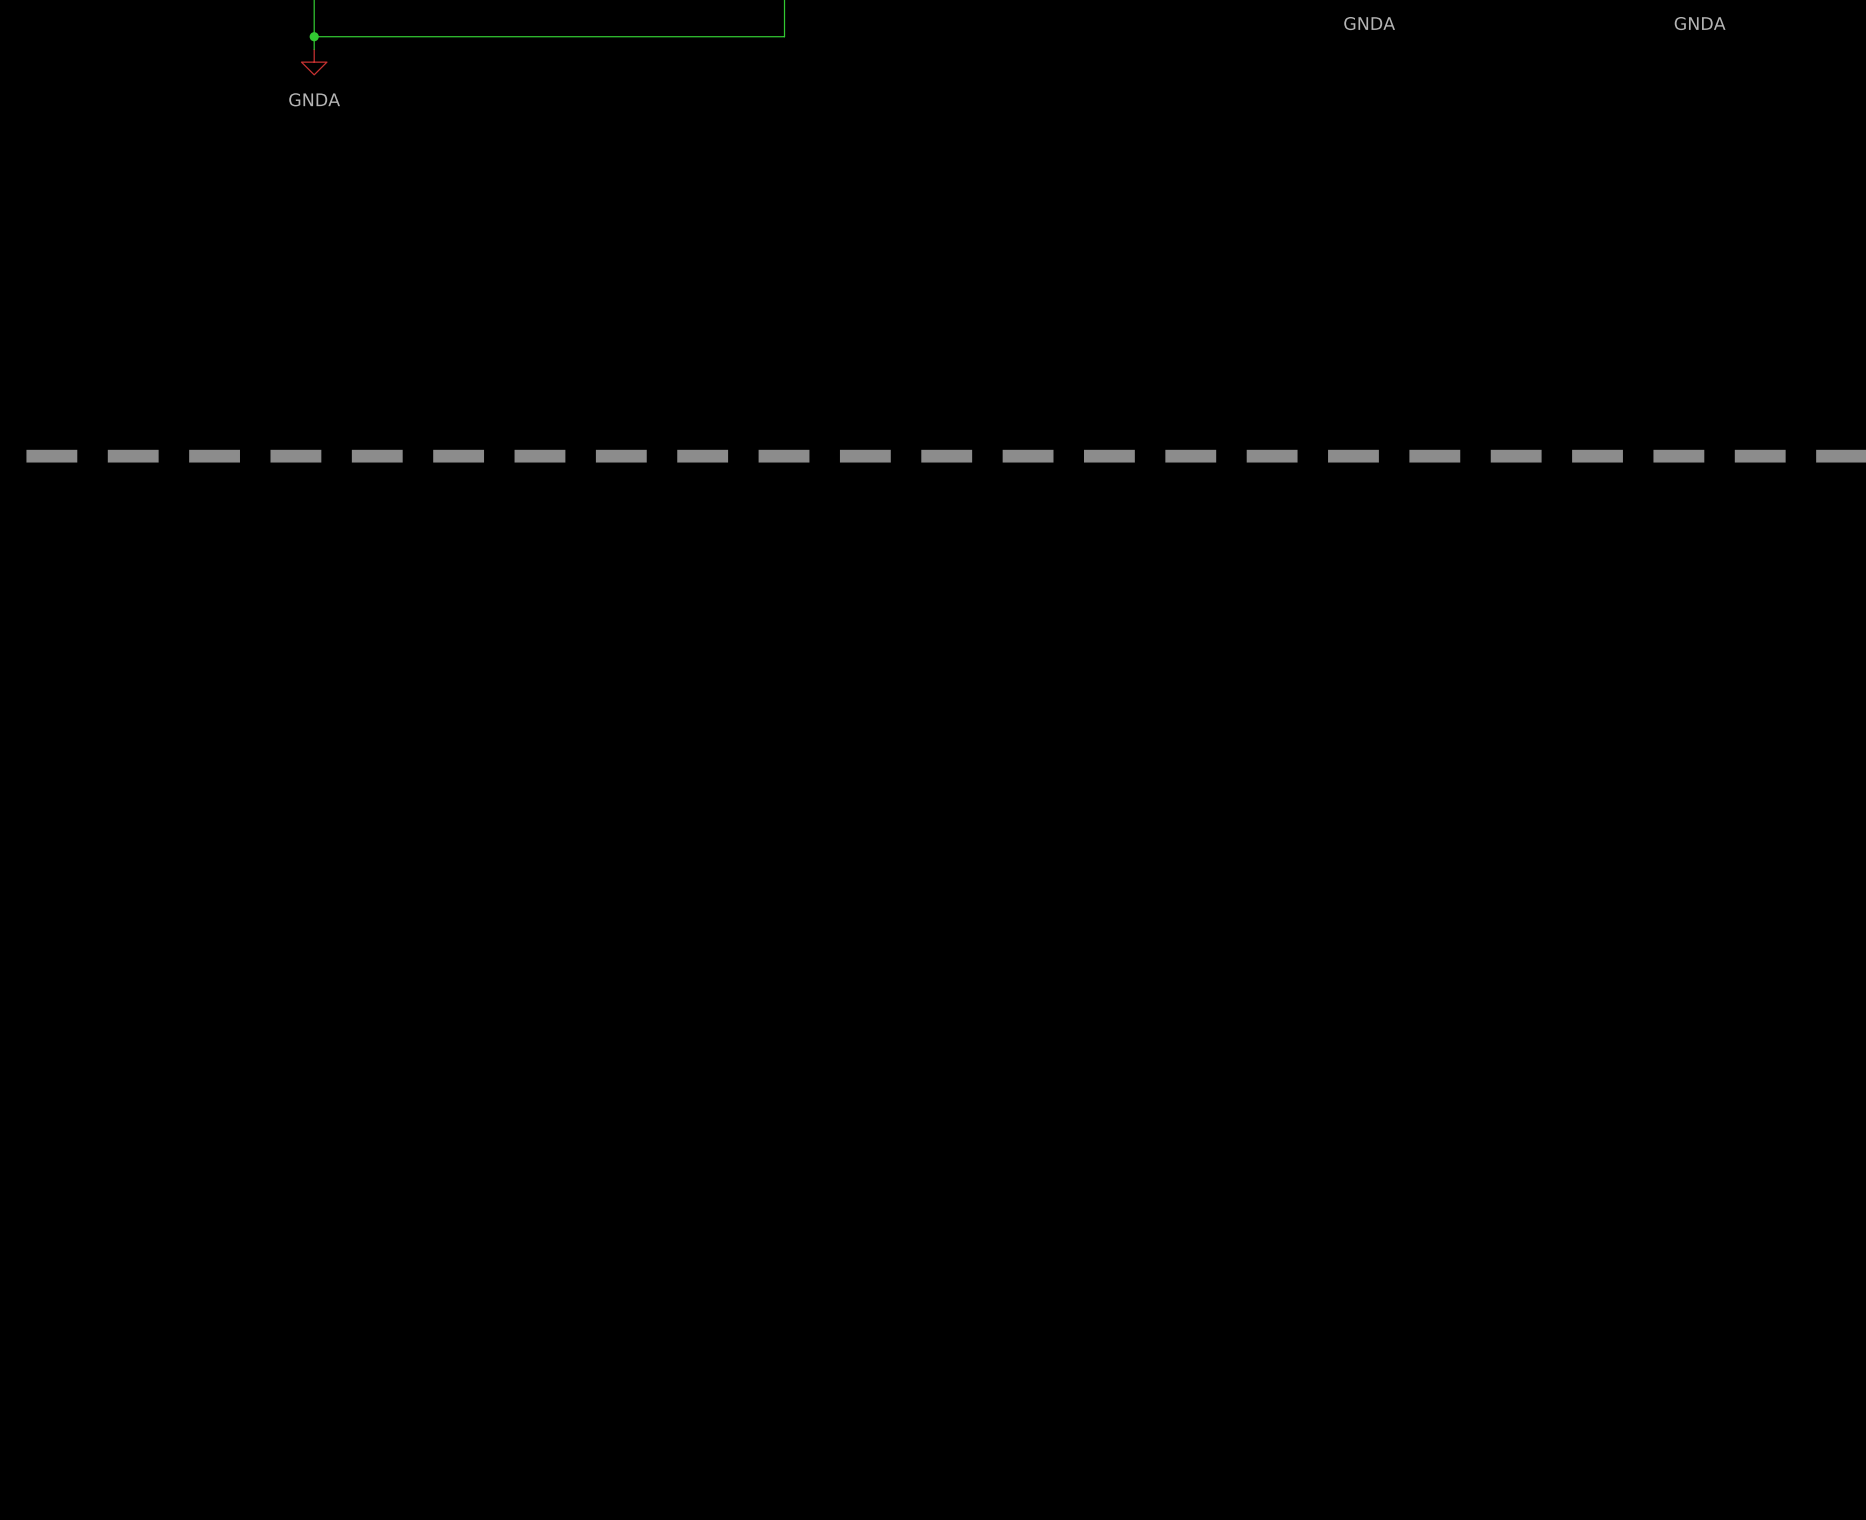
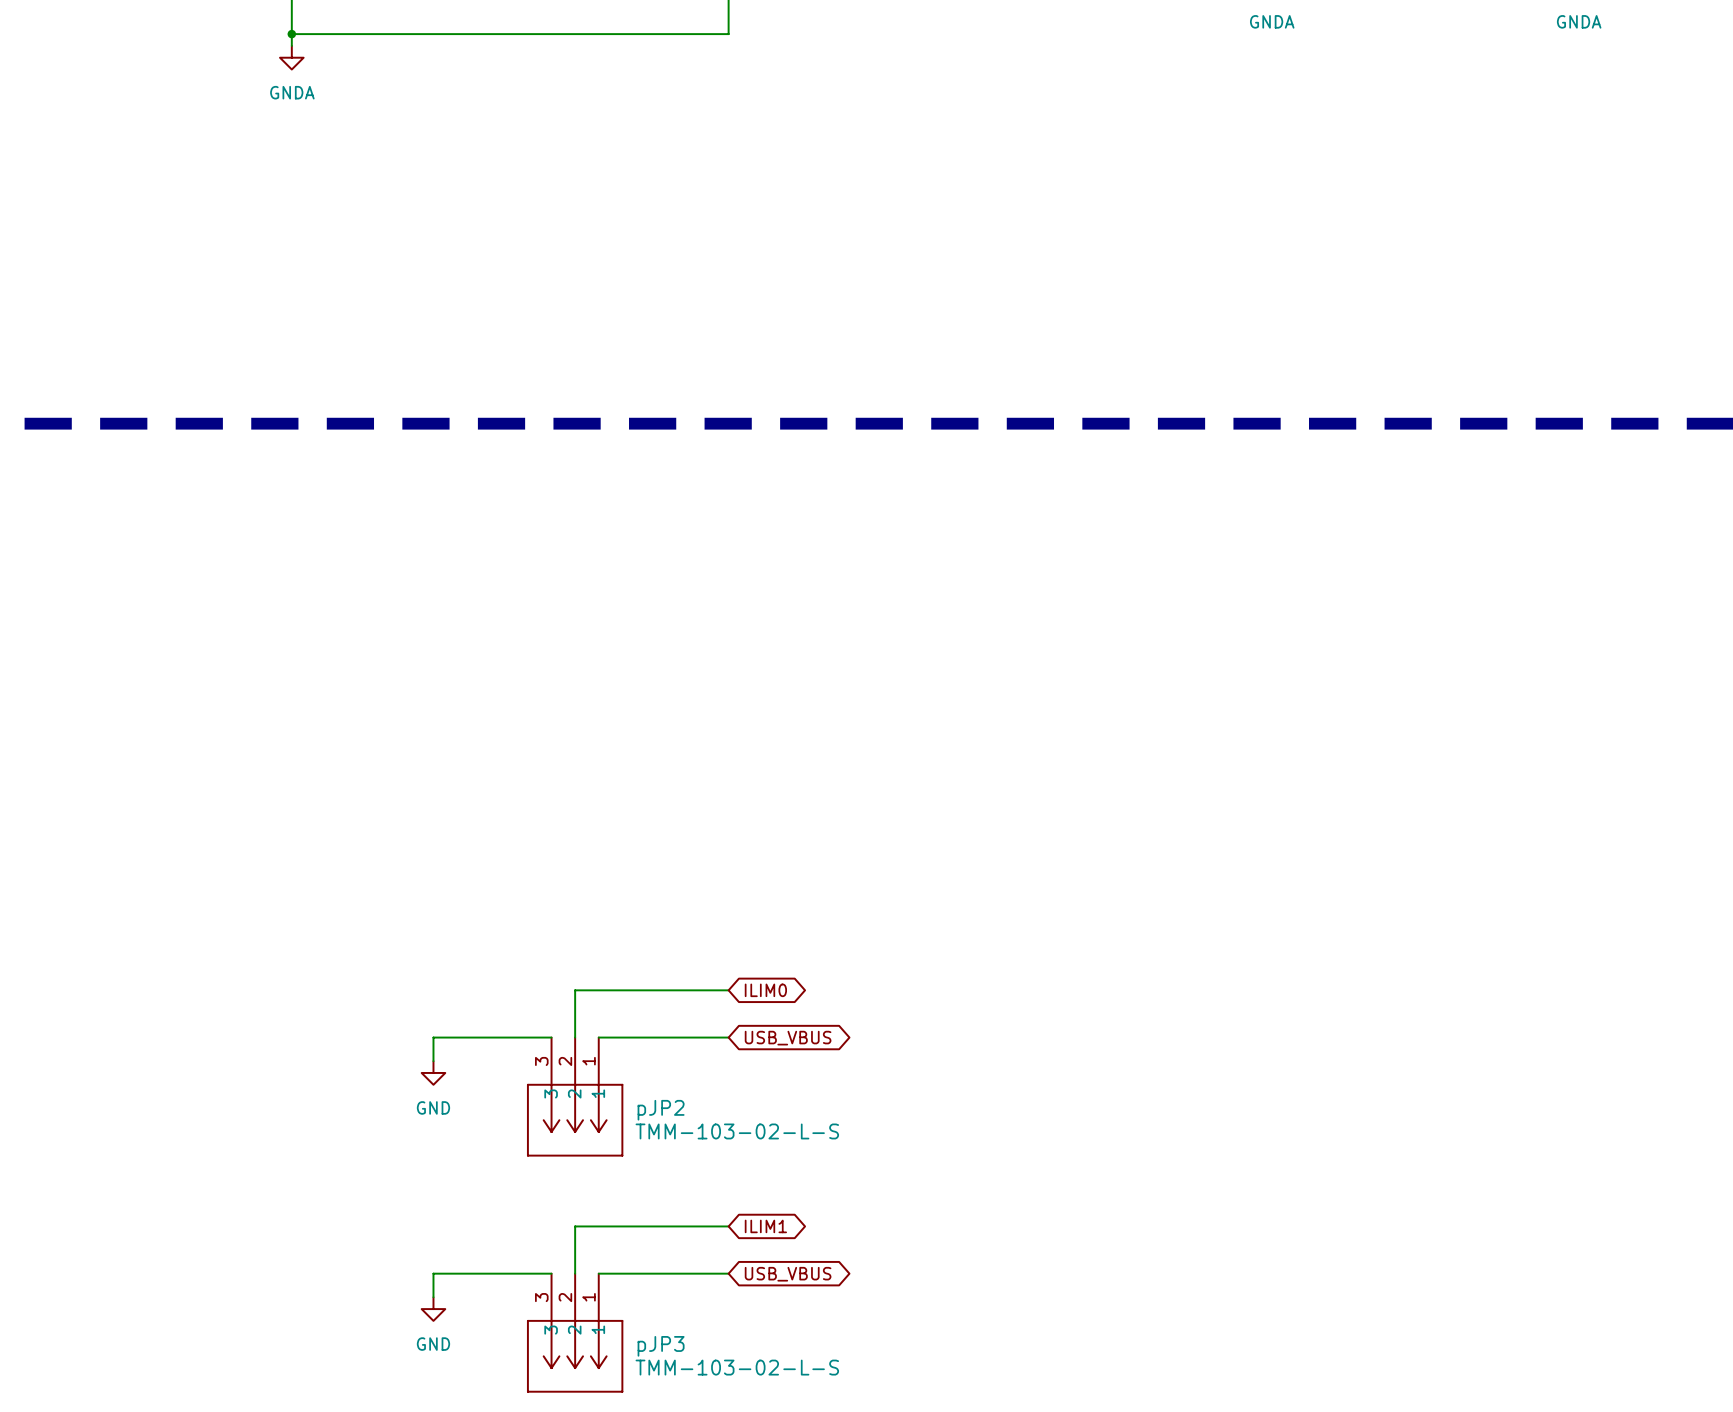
wire: none -> (728, 990) (575, 990) (575, 1037)
global label: none -> ILIM0 (765, 990)
wire: none -> (551, 1037) (433, 1037) (433, 1061)
wire: none -> (598, 1037) (728, 1037)
global label: none -> USB_VBUS (788, 1038)
power symbol: none -> GND (433, 1072)
pJP2: none -> TMM-103-02-L-S (575, 1096)
wire: none -> (728, 1226) (575, 1226) (575, 1273)
global label: none -> ILIM1 (765, 1226)
wire: none -> (551, 1273) (433, 1273) (433, 1297)
wire: none -> (598, 1273) (728, 1273)
global label: none -> USB_VBUS (788, 1274)
power symbol: none -> GND (433, 1309)
pJP3: none -> TMM-103-02-L-S (575, 1332)

